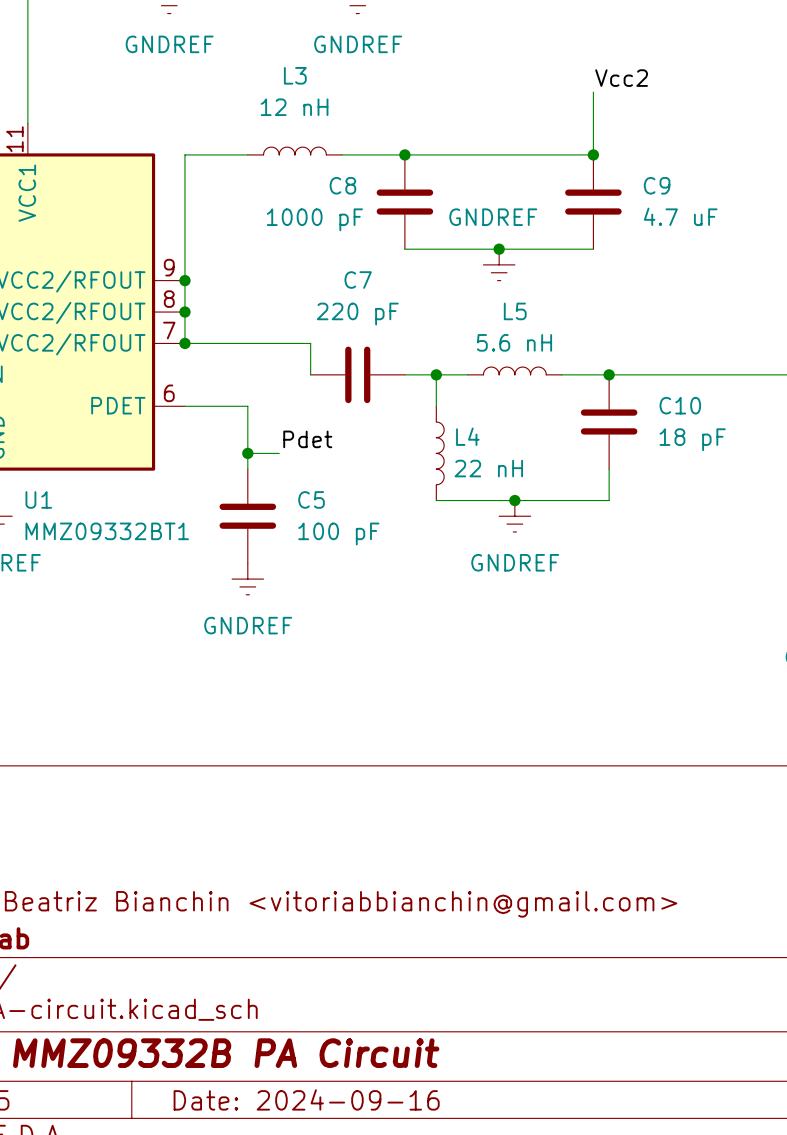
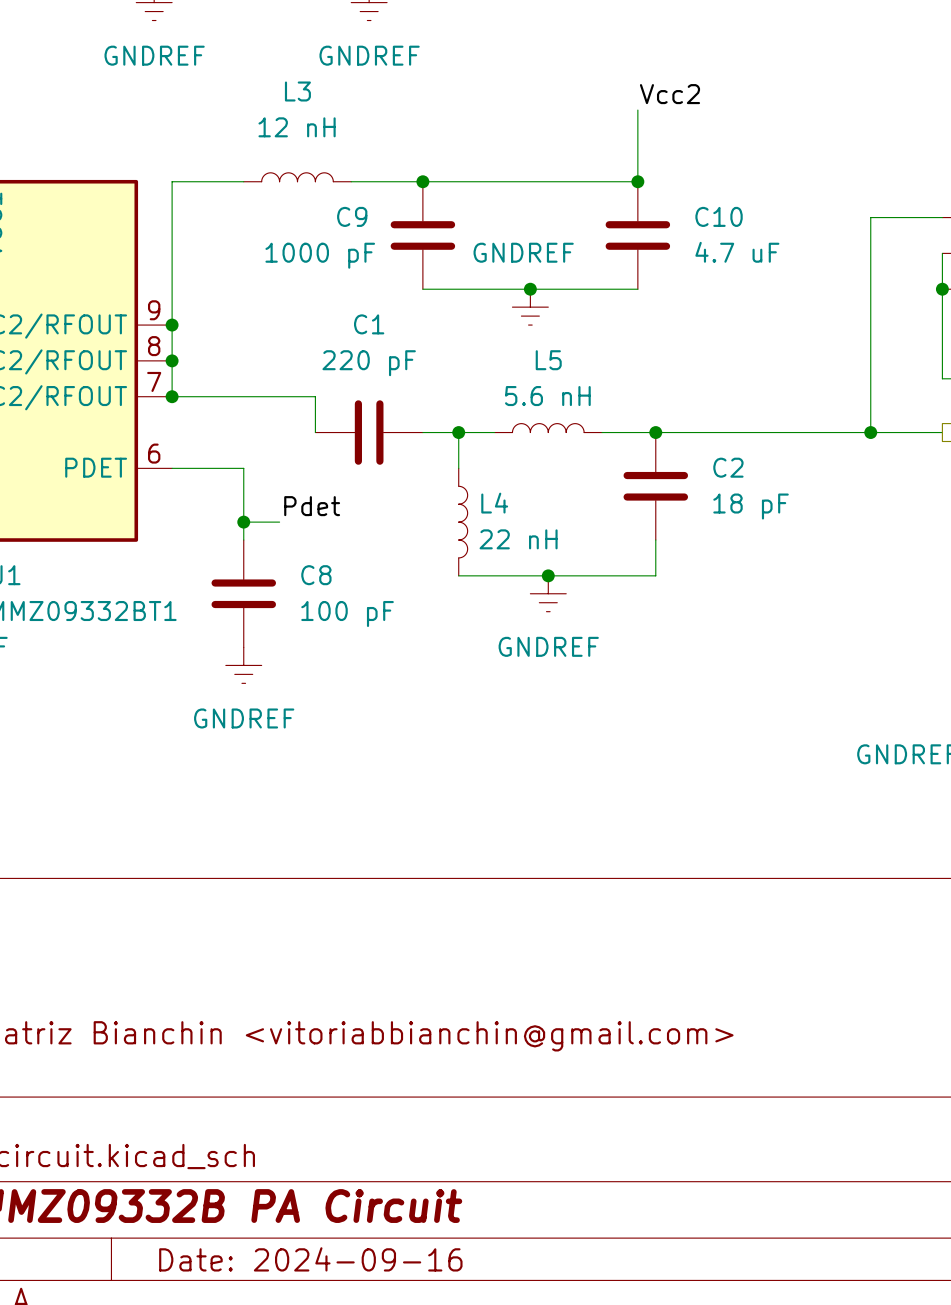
C8 name: C8 (342, 185) -> C9 (352, 216)
C9 name: C9 (657, 185) -> C10 (719, 216)
C7 name: C7 (358, 280) -> C1 (369, 324)
C10 name: C10 (680, 405) -> C2 (728, 467)
C5 name: C5 (311, 499) -> C8 (316, 575)

